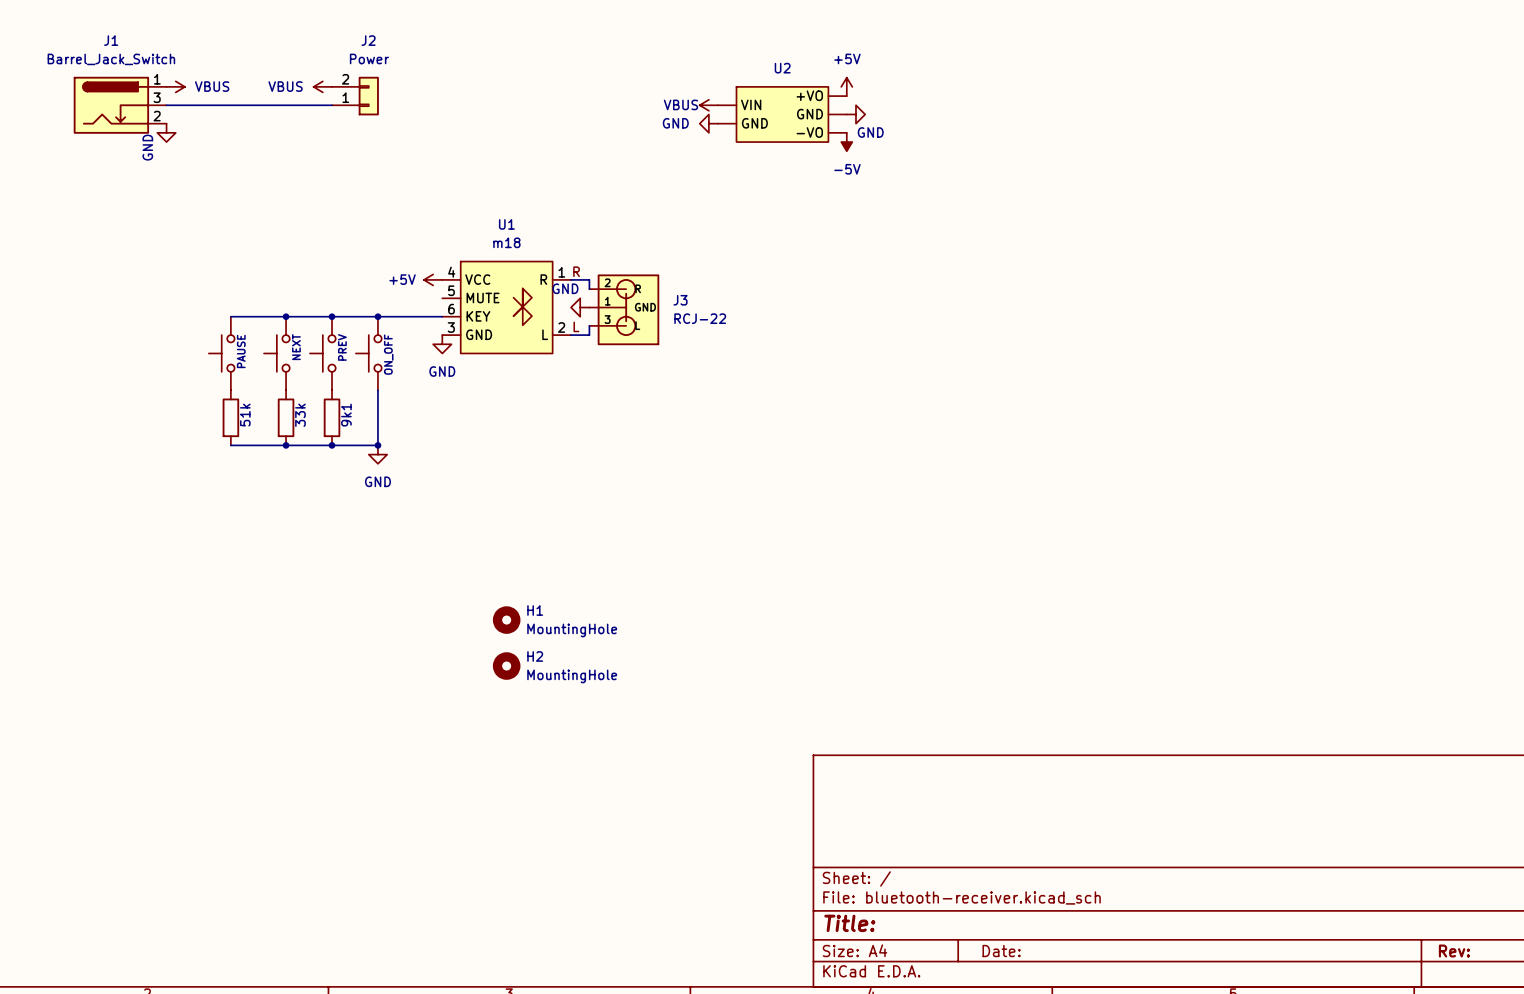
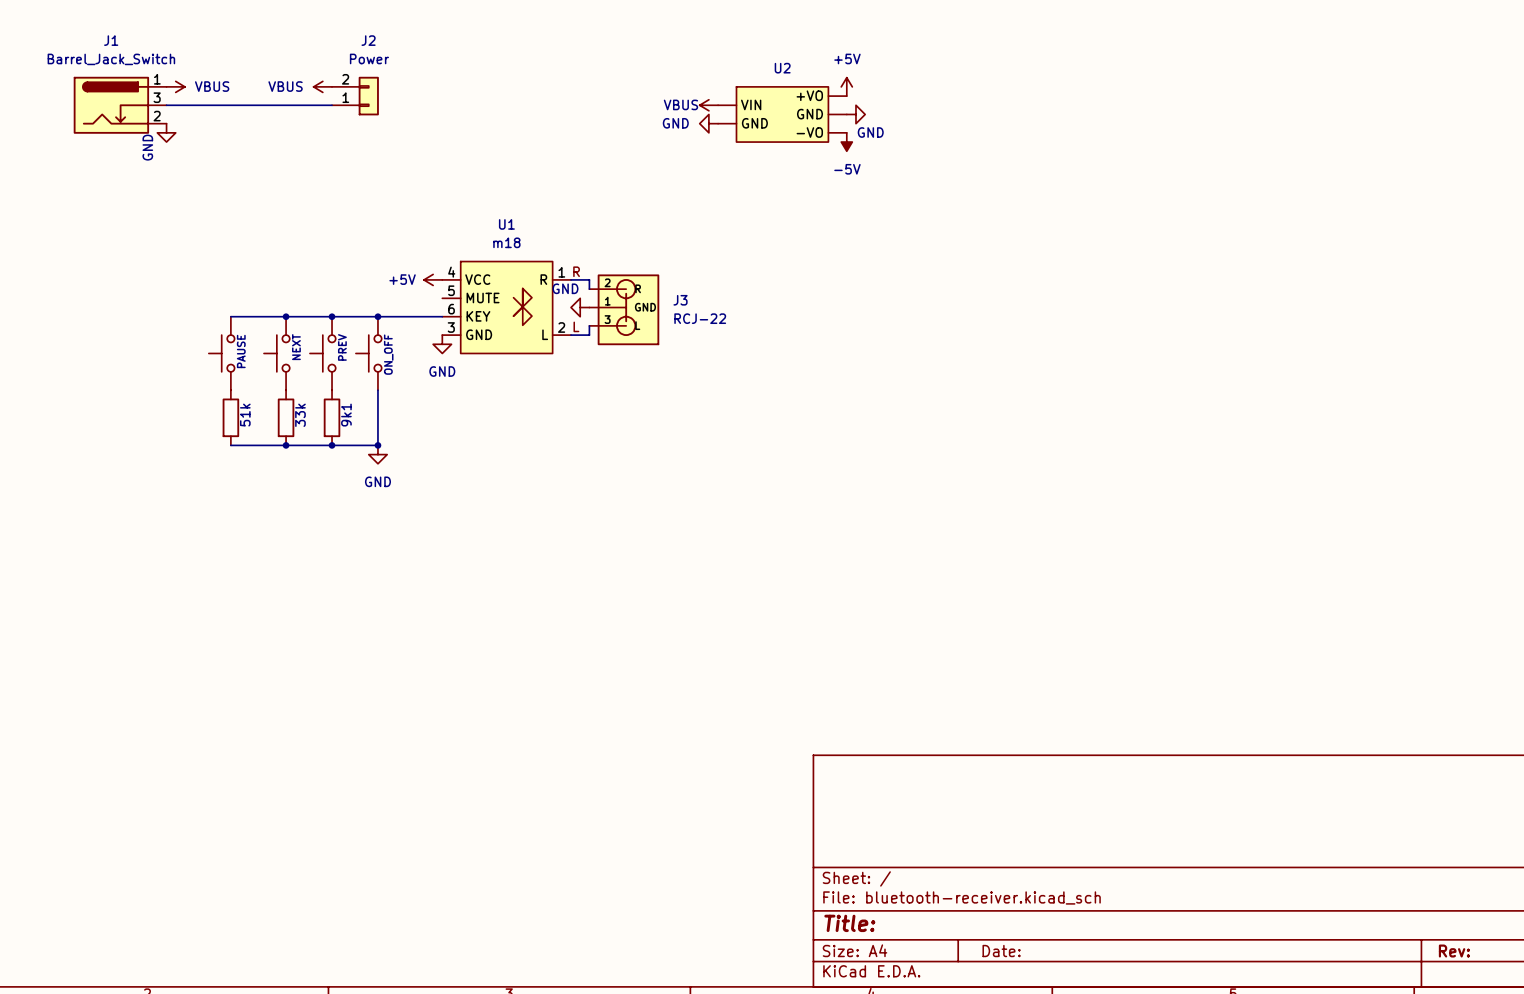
H1: MountingHole (506, 620) -> none
H2: MountingHole (506, 666) -> none

